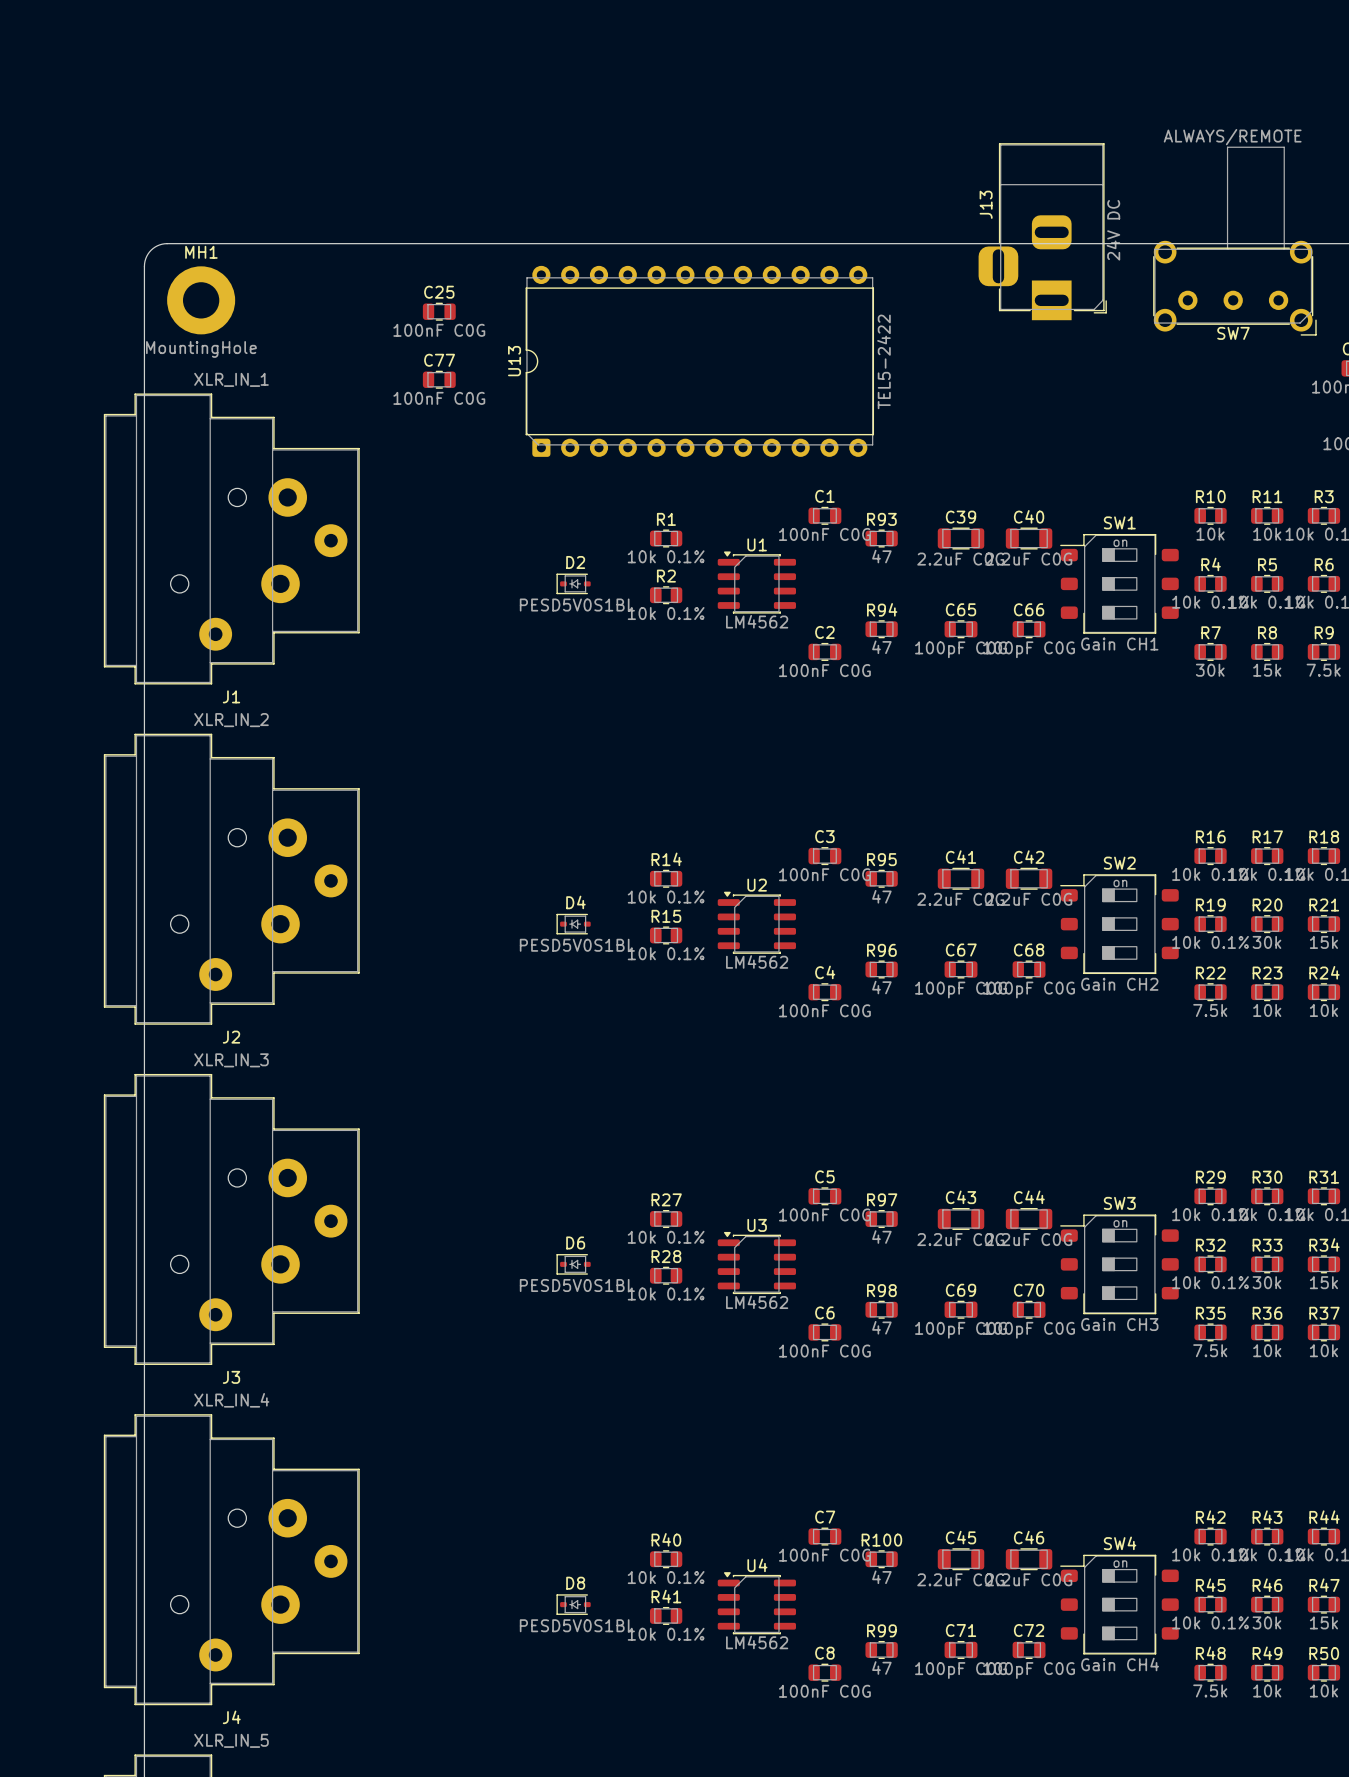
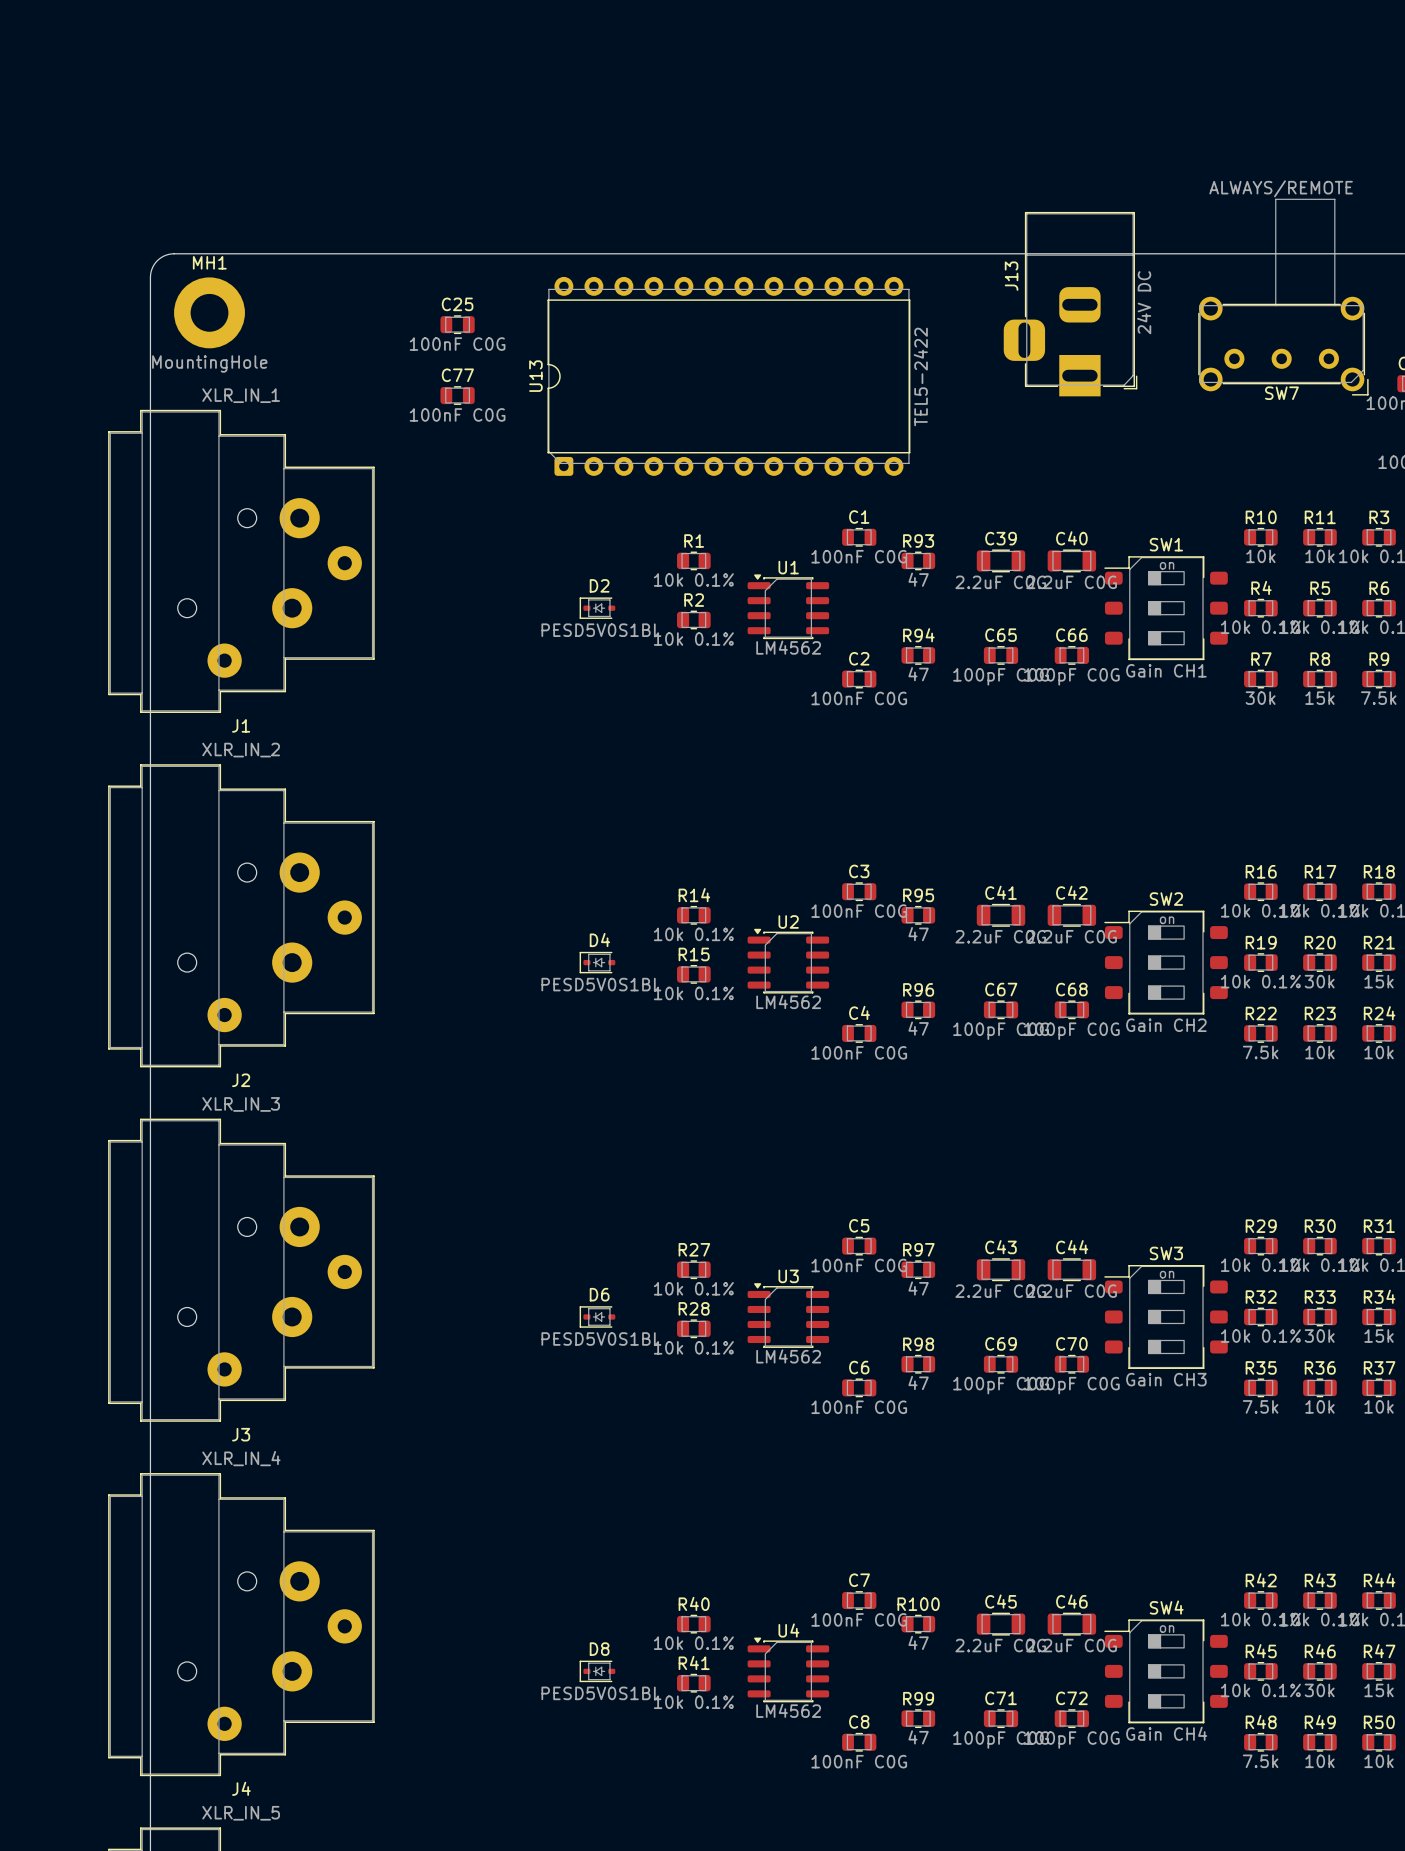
J13 position: (1042, 231) -> (1070, 304)
SW7 position: (1234, 241) -> (1283, 297)

